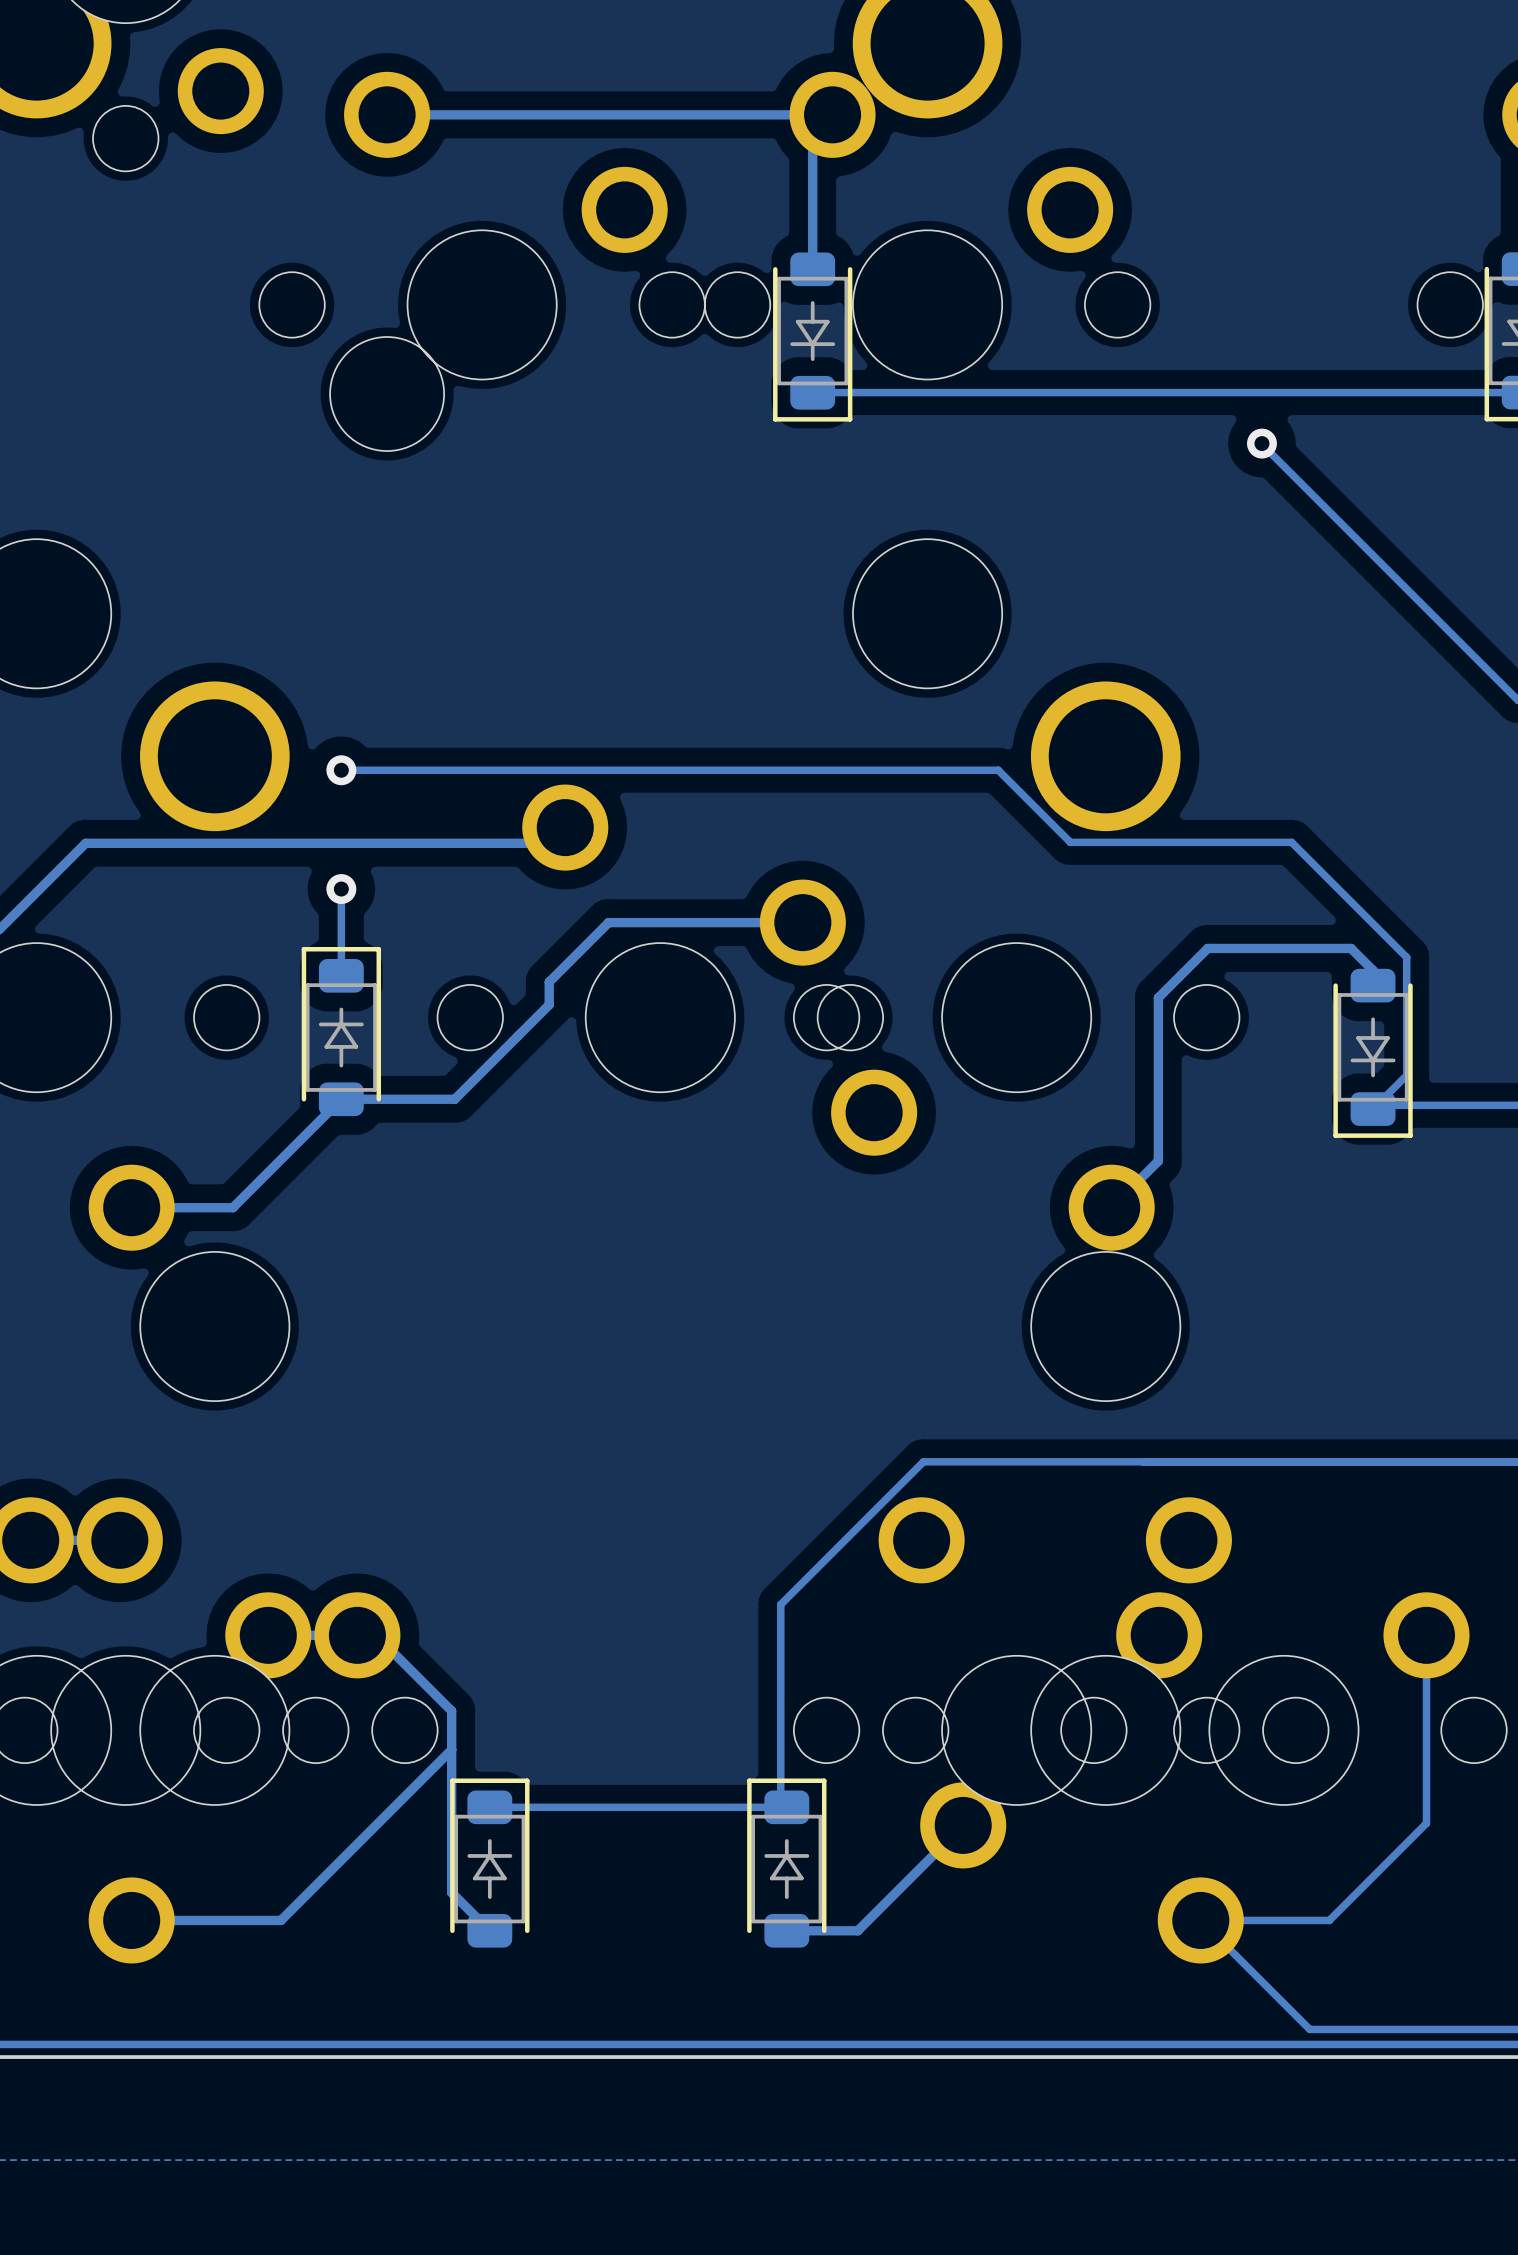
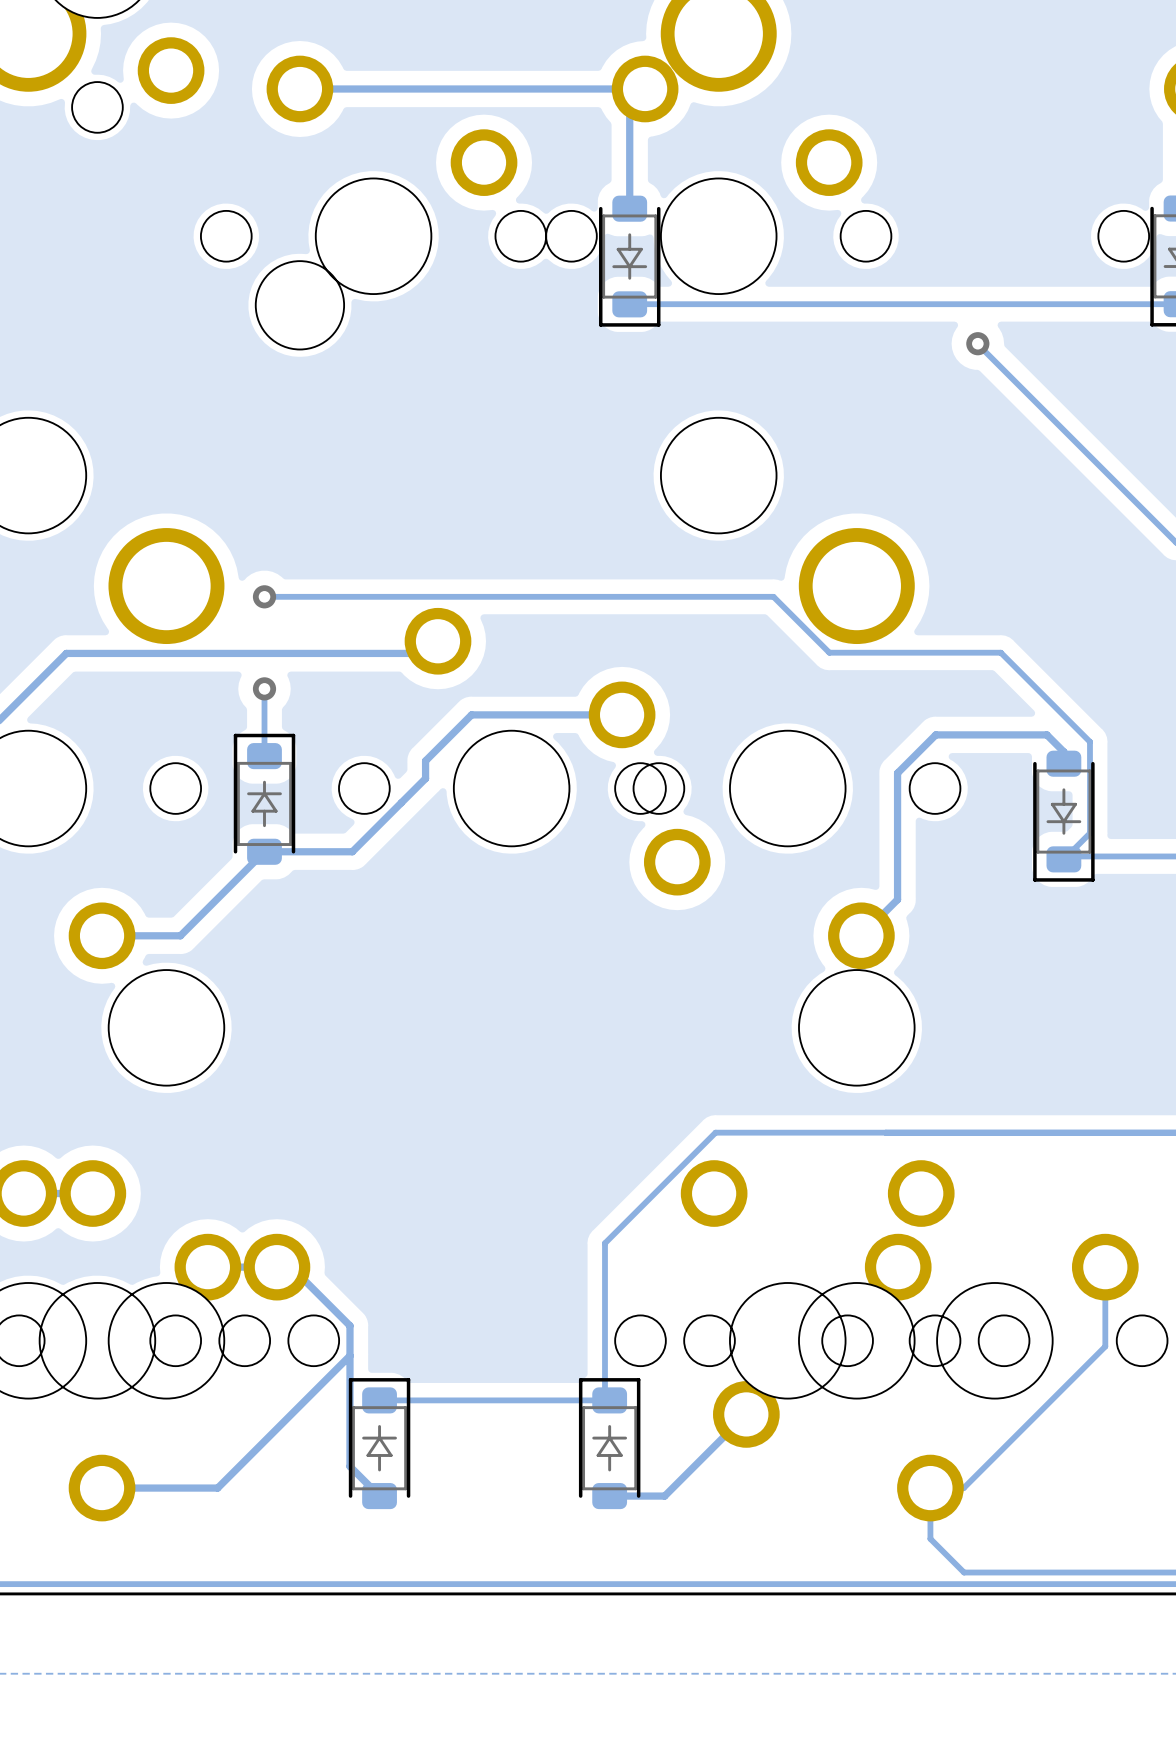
track: (1426, 1737) (1426, 1823) (1329, 1920) (1243, 1920) -> (1105, 1346) (963, 1488)
track: (1200, 1920) (1309, 2029) -> (930, 1488) (930, 1538) (964, 1572) (1014, 1572)

